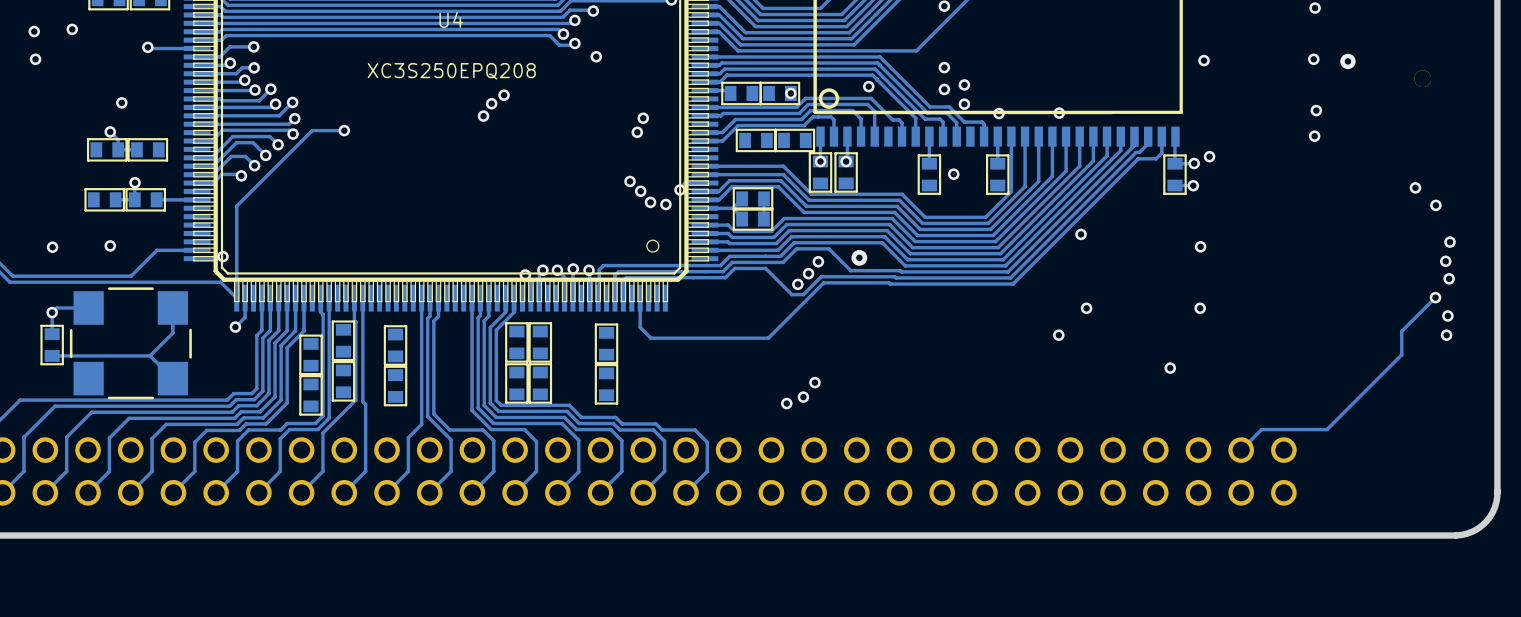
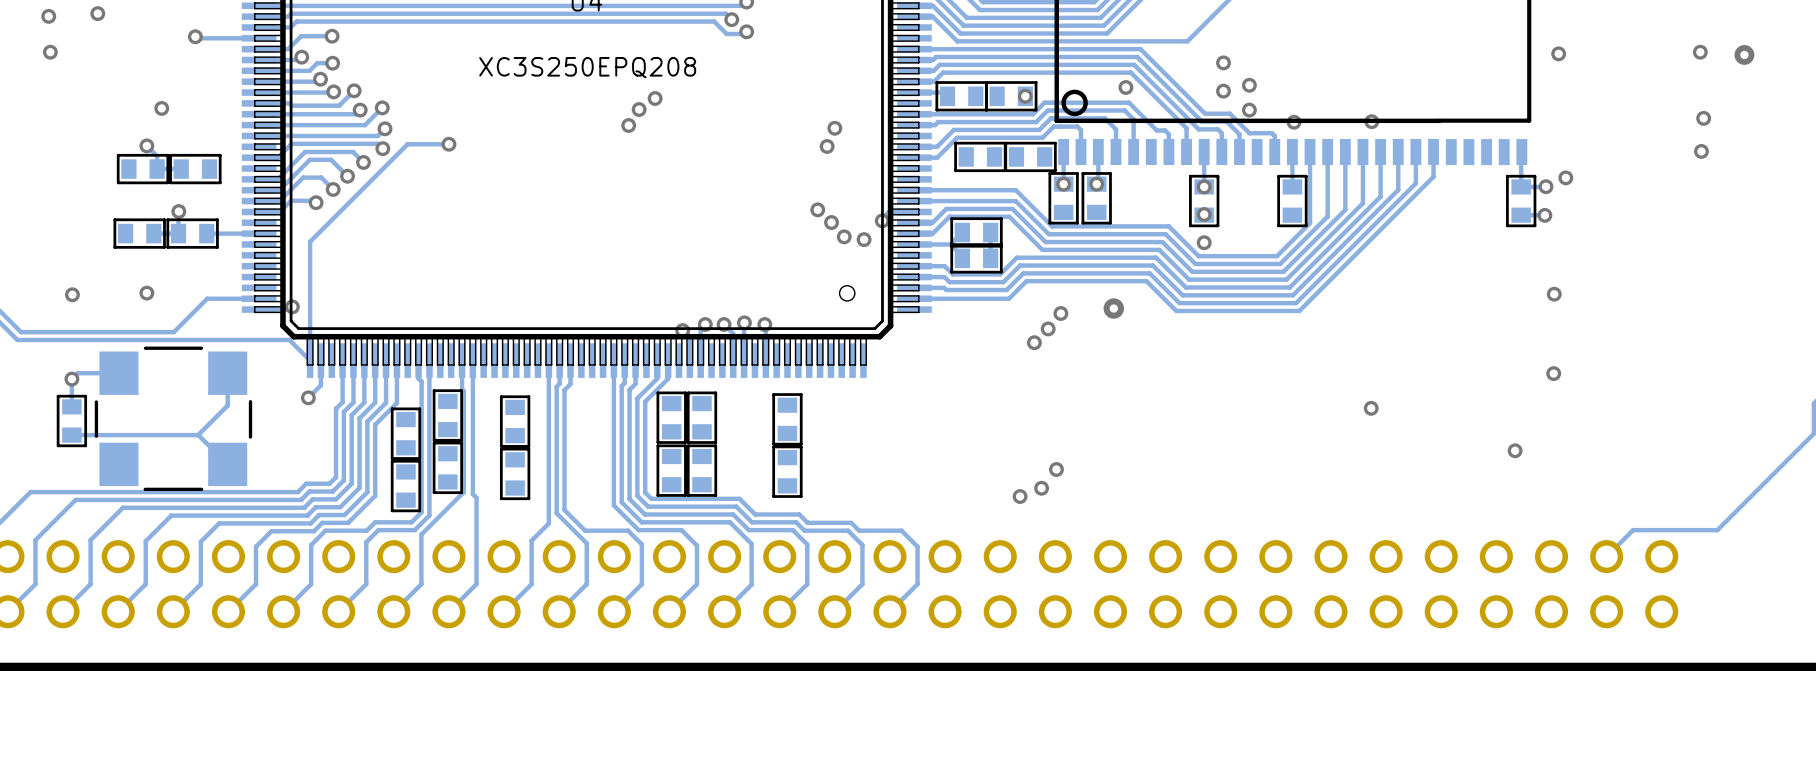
via: (596, 56) -> none
track: (1120, 136) (1120, 150) (1005, 265) (905, 265) (882, 242) (794, 242) (780, 256) (729, 256) (720, 265) (603, 265) (599, 269) (598, 298) -> none
track: (1134, 136) (1134, 145) (1008, 271) (850, 270) (828, 248) (796, 248) (783, 262) (732, 262) (723, 271) (618, 271) (614, 275) (614, 298) -> none
track: (1148, 136) (1148, 143) (1139, 152) (1136, 152) (1010, 277) (821, 276) (803, 294) (791, 294) (765, 268) (734, 268) (725, 277) (626, 277) (623, 280) (623, 298) -> none
track: (1161, 136) (1161, 153) (1156, 158) (1138, 158) (1013, 284) (823, 282) (768, 338) (650, 338) (640, 327) (640, 298) -> none
via: none -> (1204, 186)
via: (953, 174) -> none
via: none -> (1204, 214)
via: none -> (1204, 242)
via: (1081, 234) -> none
via: (1086, 308) -> none

